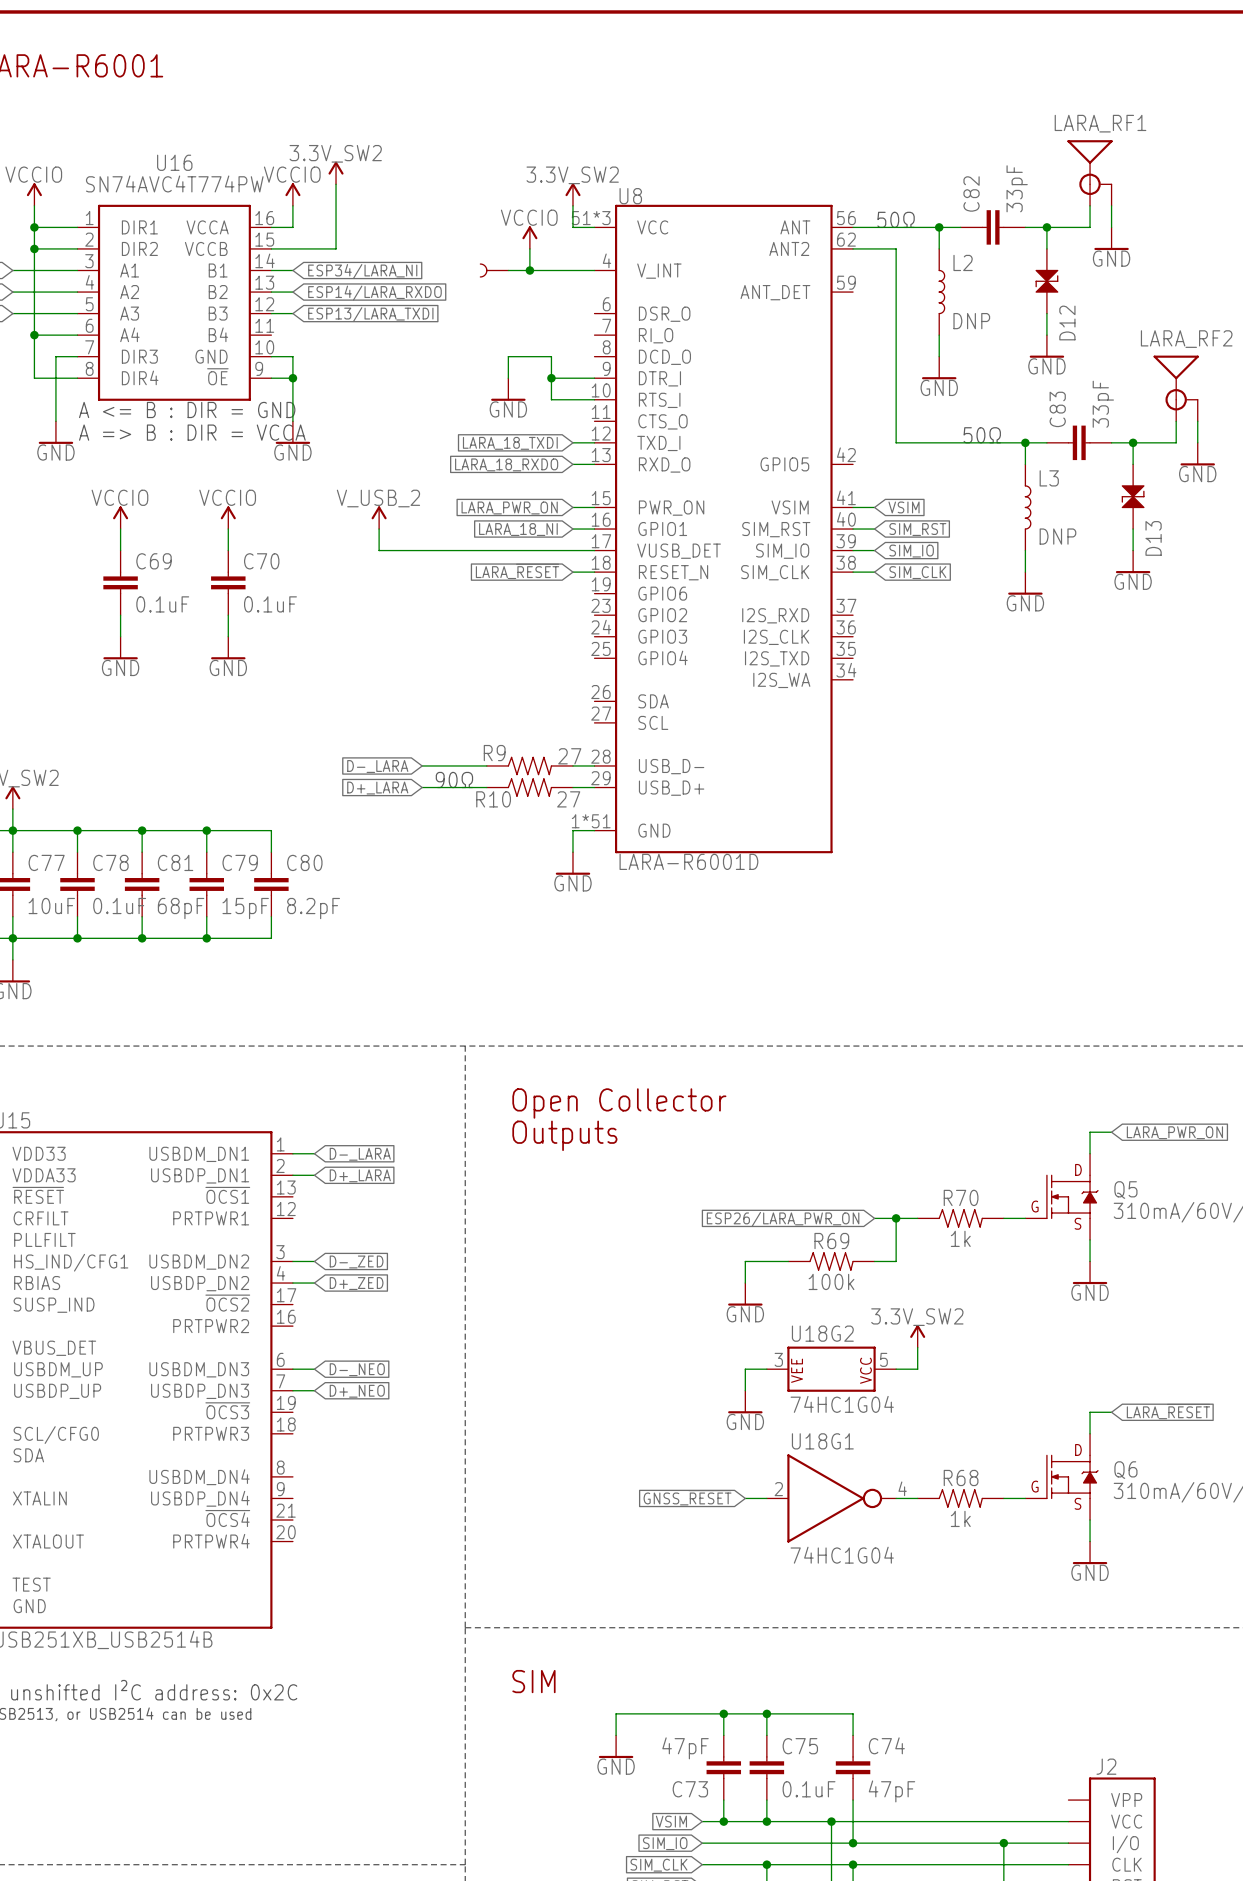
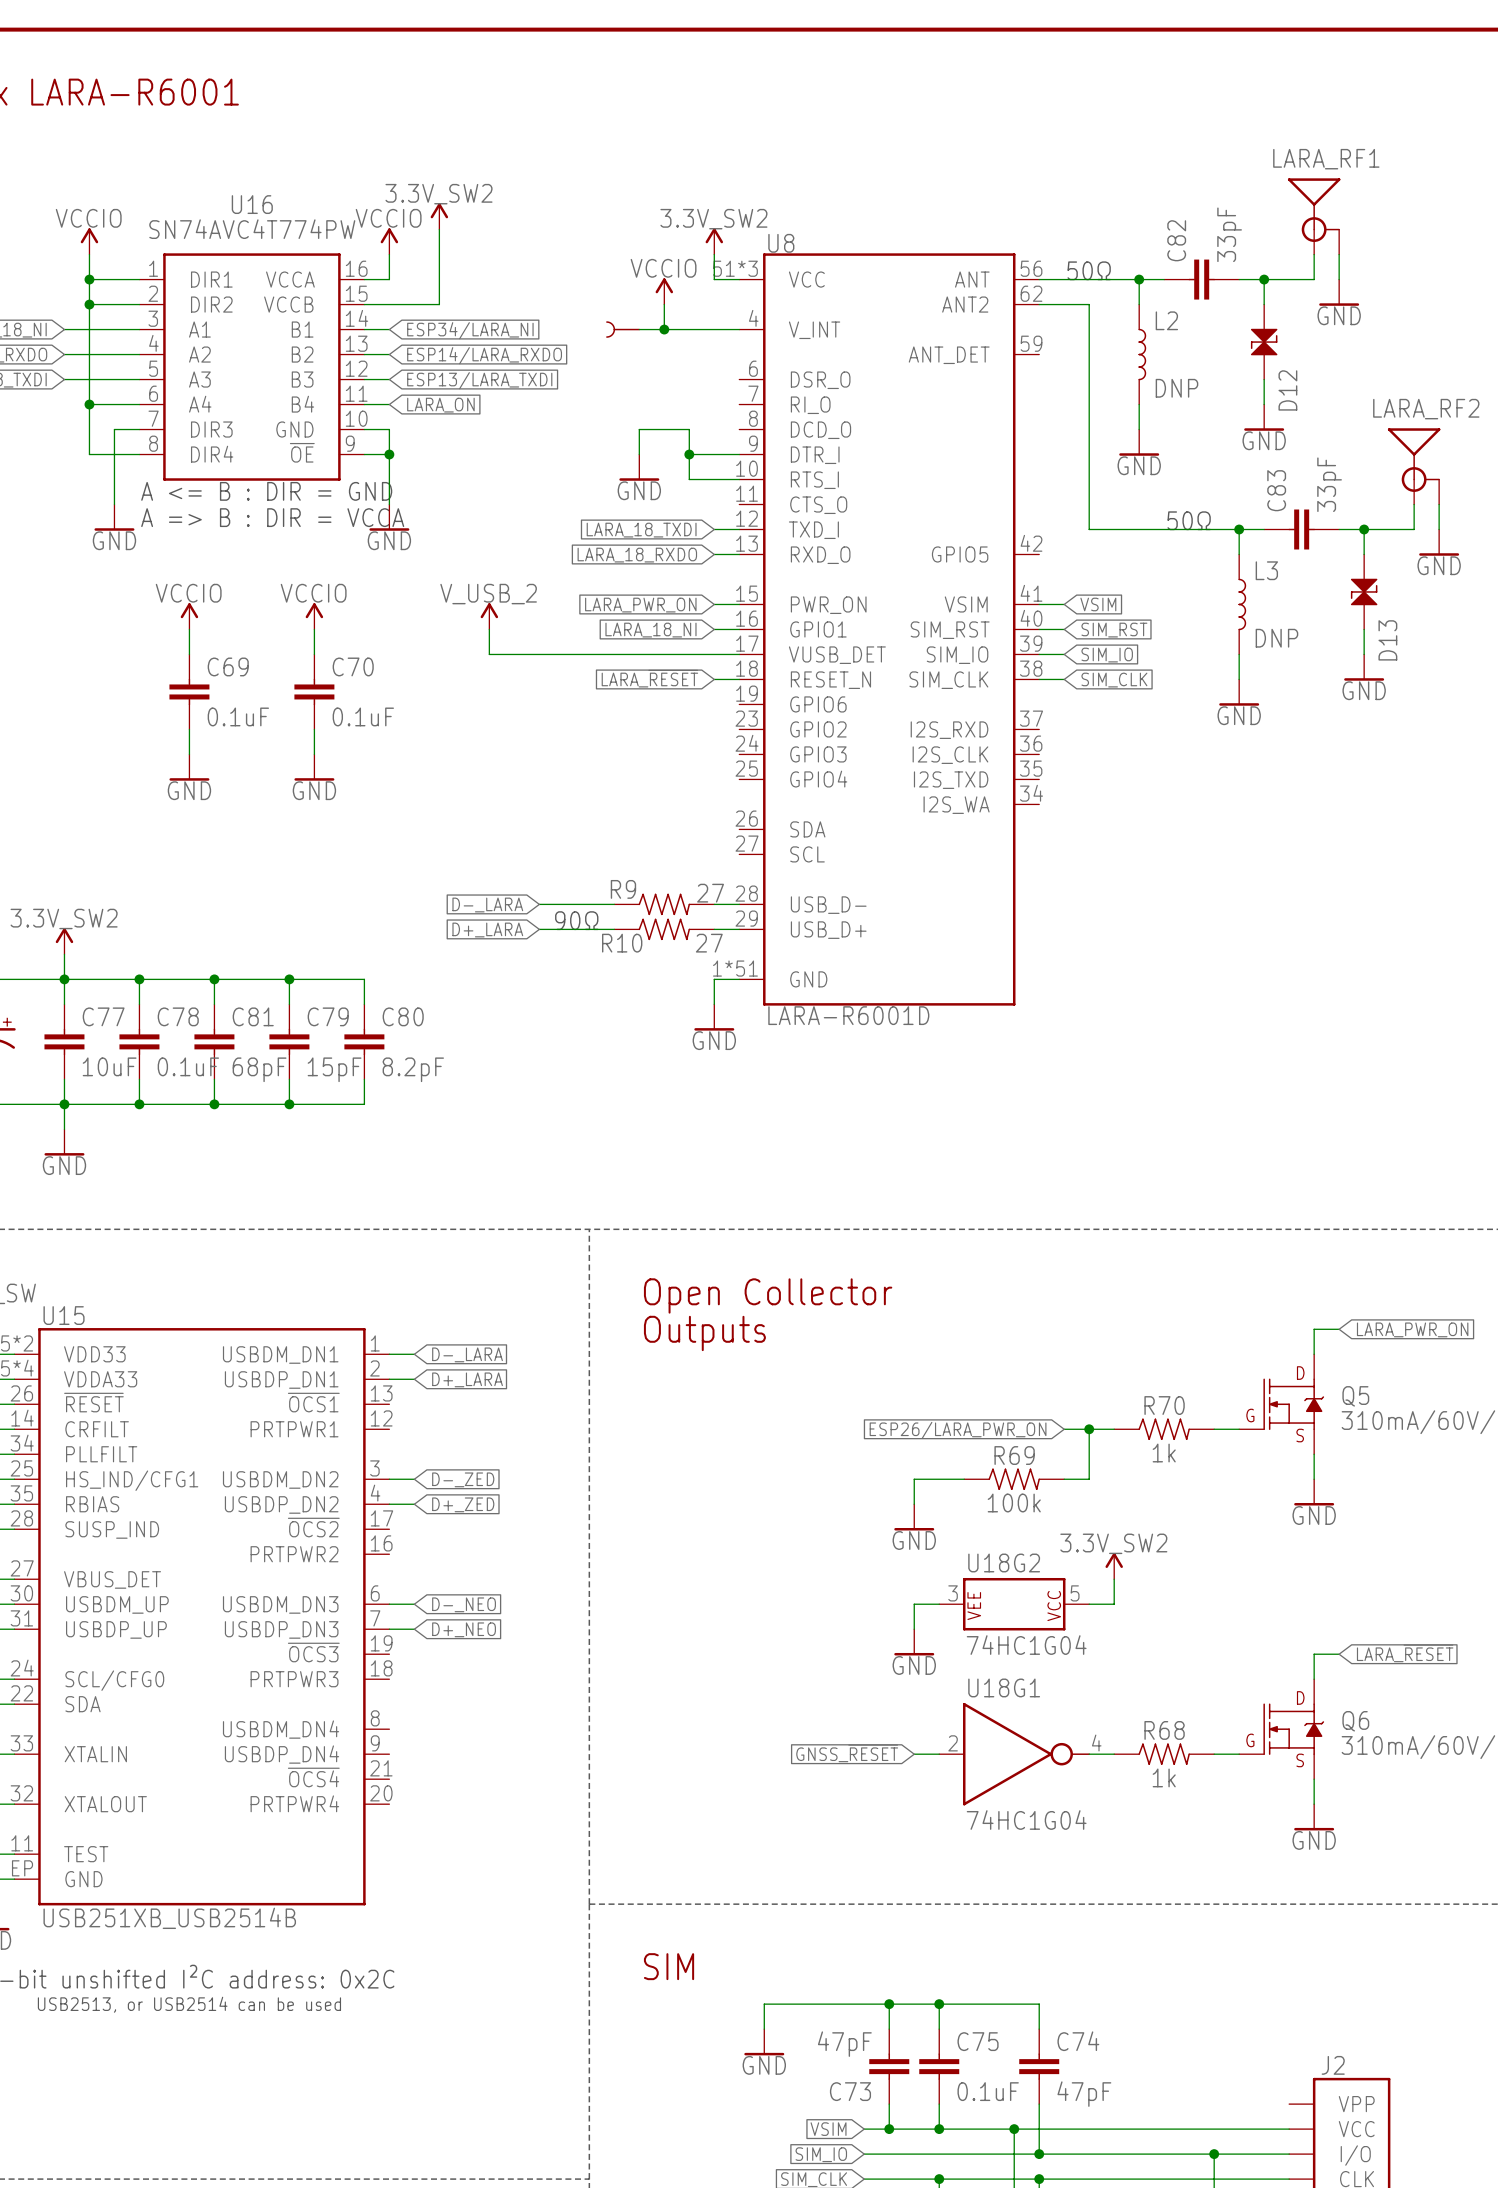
wire: none -> (364, 404) (389, 404)
global label: none -> LARA_ON (440, 405)

